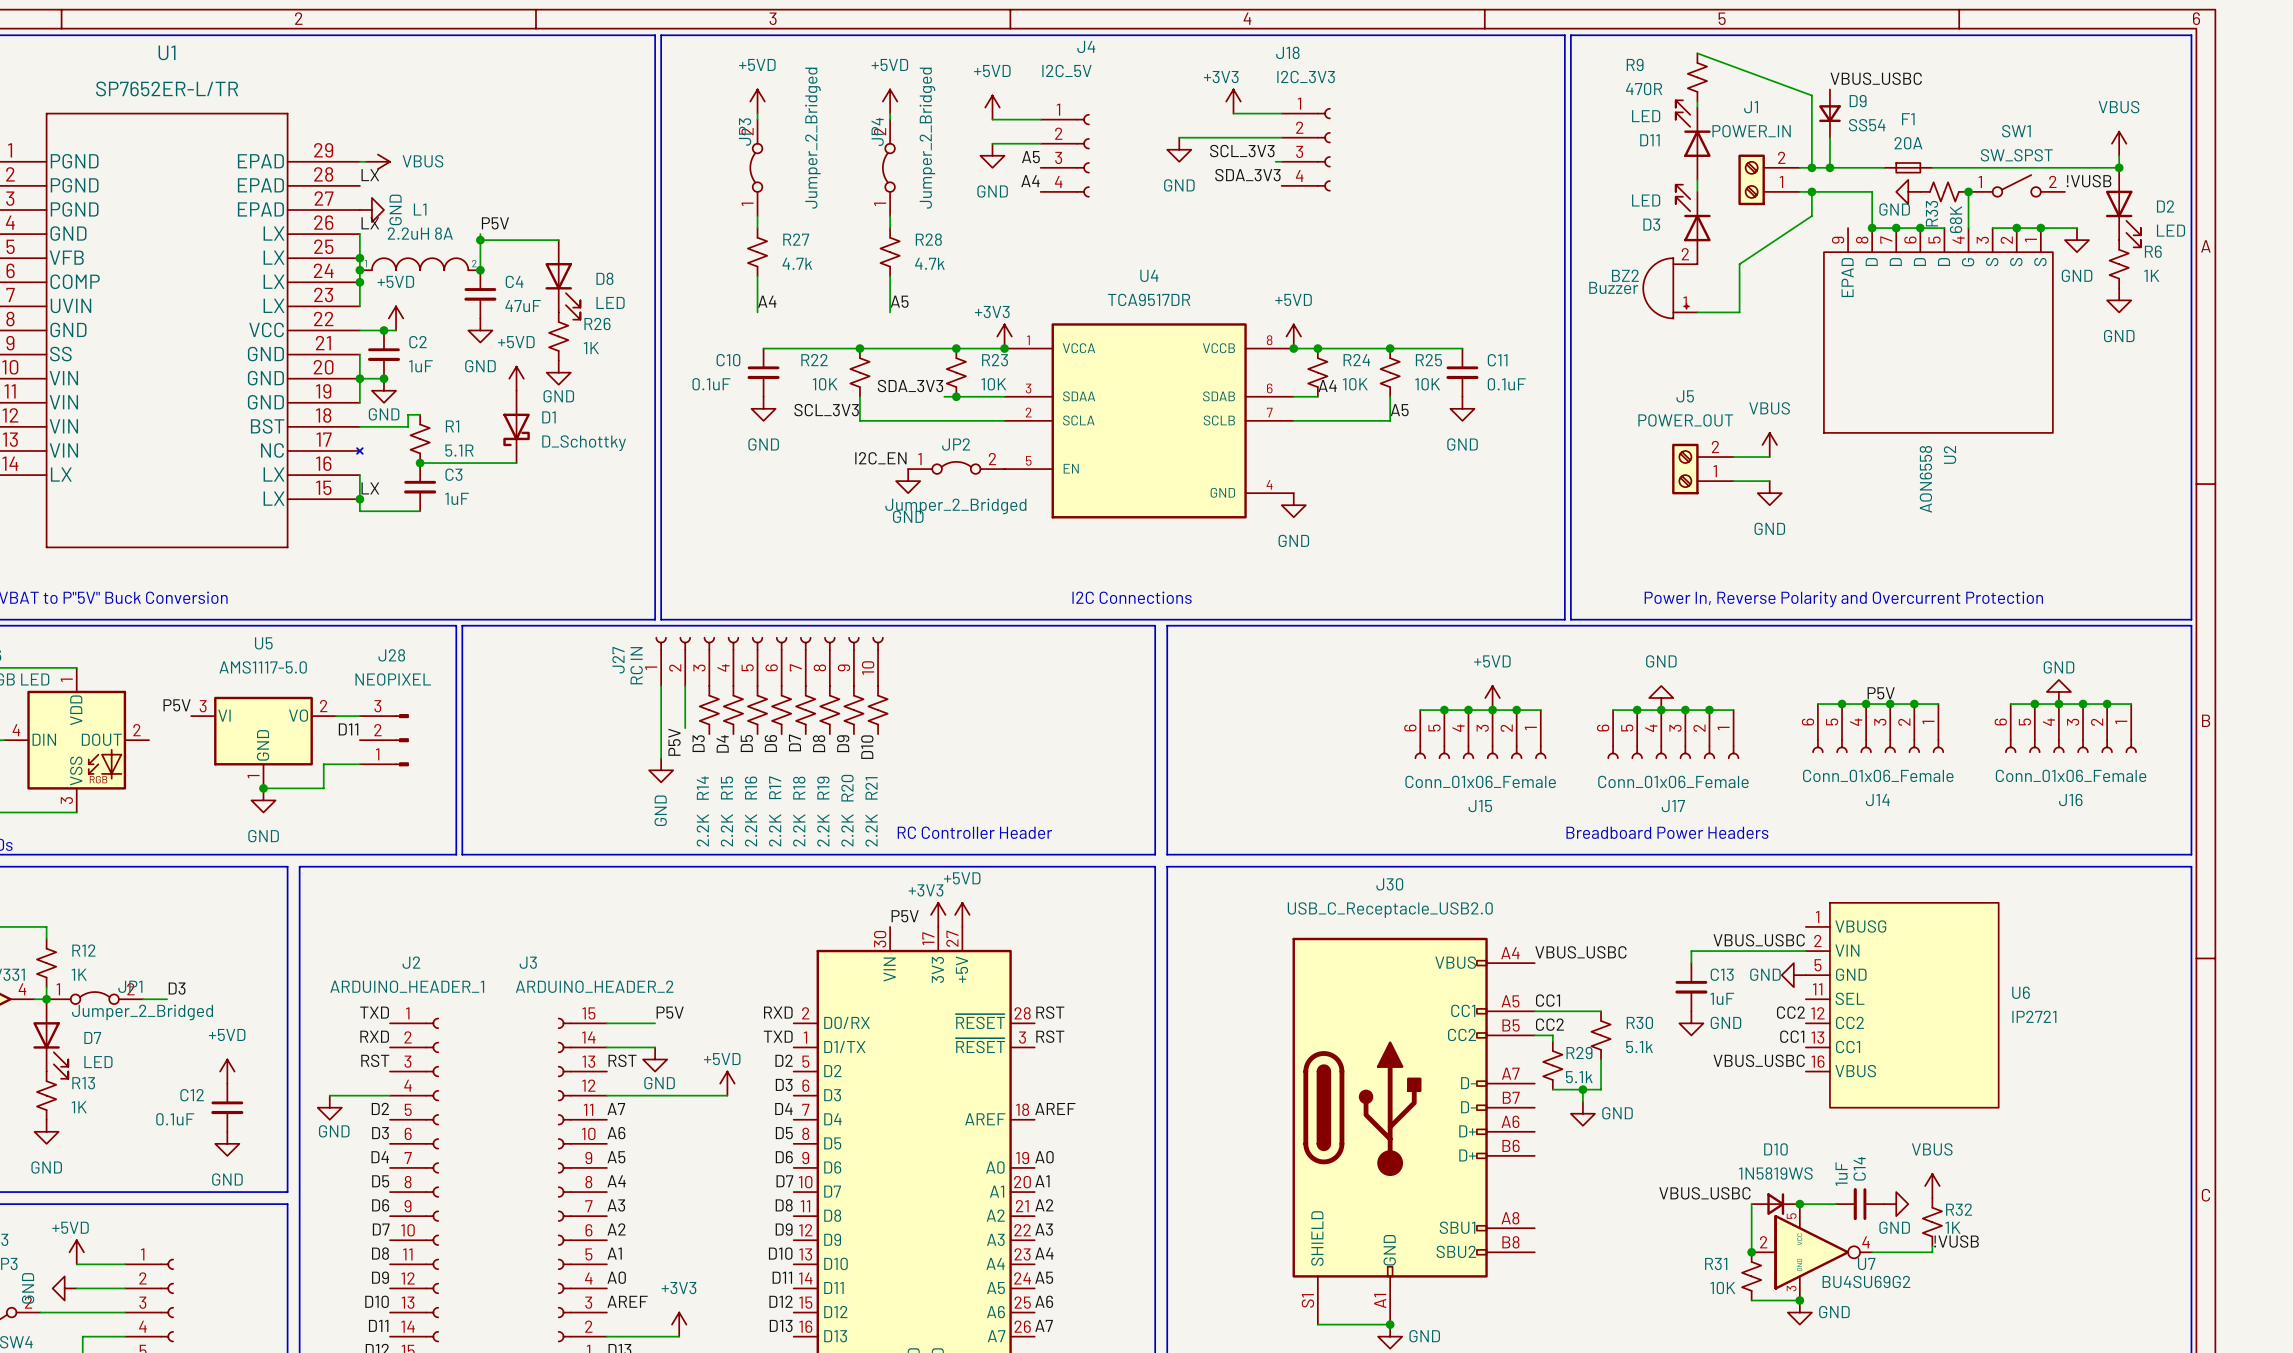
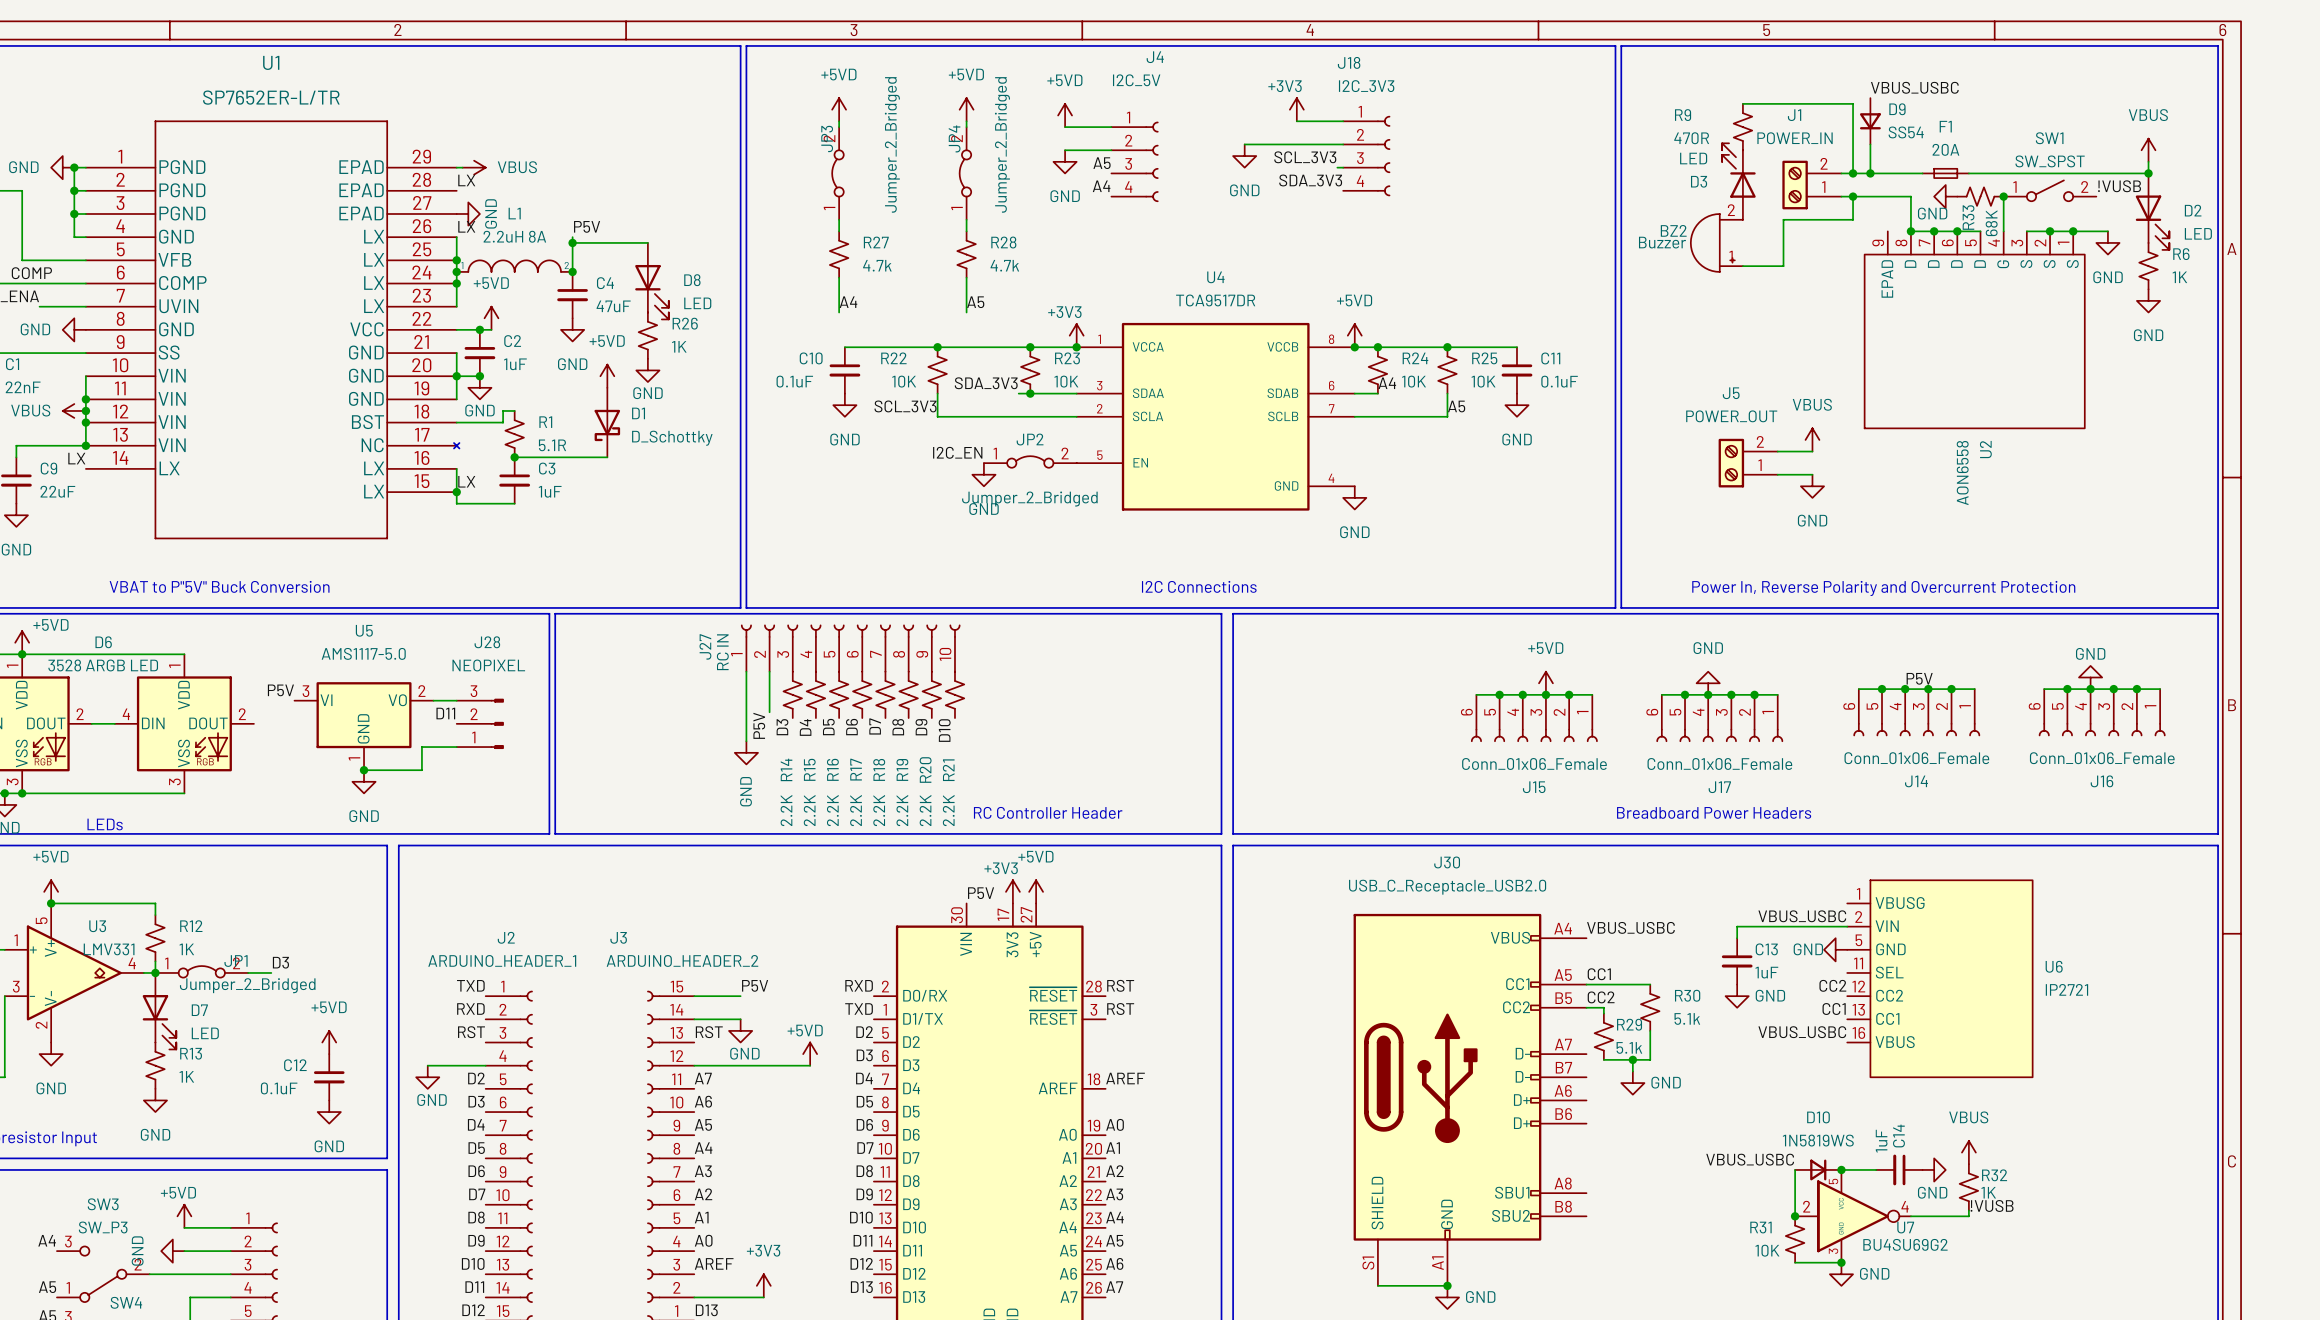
wire: (1697, 53) (1811, 95) -> (1742, 103) (1853, 103)
R9 position: (1697, 77) -> (1742, 127)
D11: LED (1693, 140) -> none
wire: (1811, 216) (1739, 264) (1739, 312) (1697, 312) -> (1853, 219) (1783, 219) (1783, 266) (1742, 266)
D3 position: (1693, 224) -> (1738, 181)
BZ2 position: (1670, 288) -> (1716, 242)

